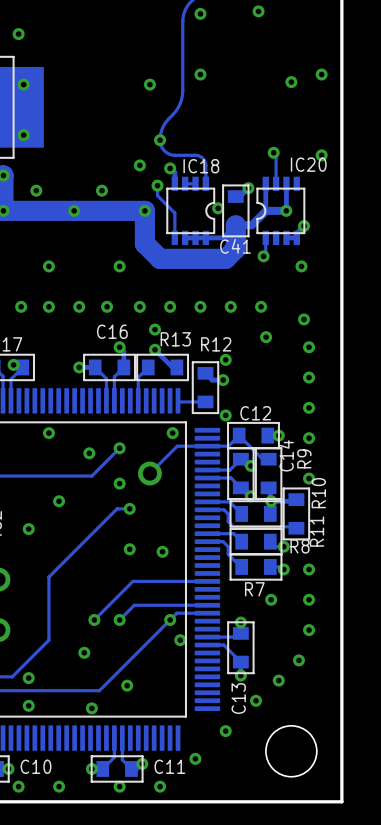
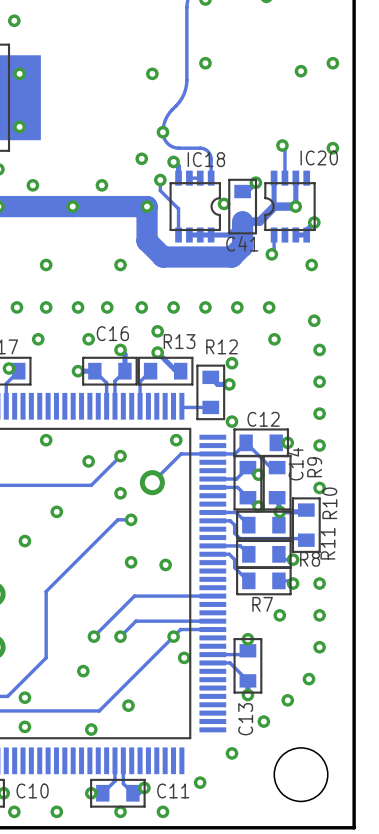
via: none -> (38, 339)
via: none -> (88, 339)

